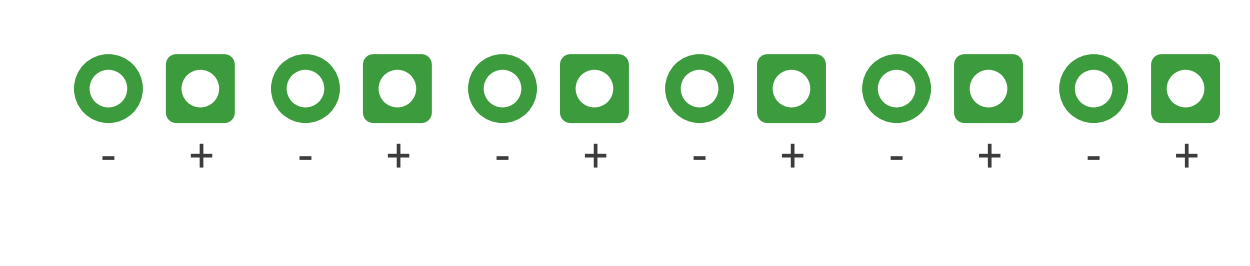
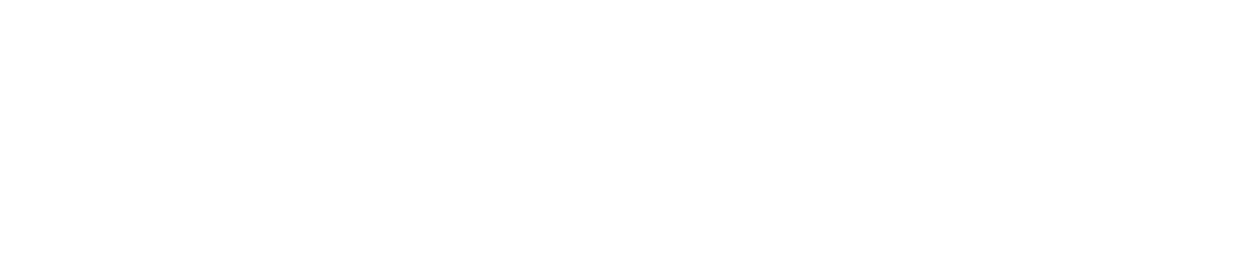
part: (154, 88) -> none
part: (351, 88) -> none
part: (548, 88) -> none
part: (745, 88) -> none
part: (942, 88) -> none
part: (1139, 88) -> none

